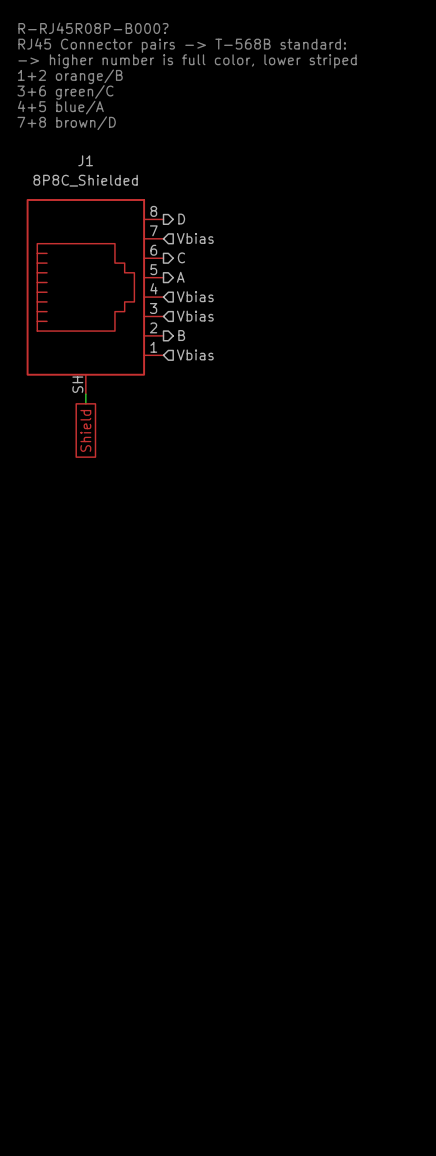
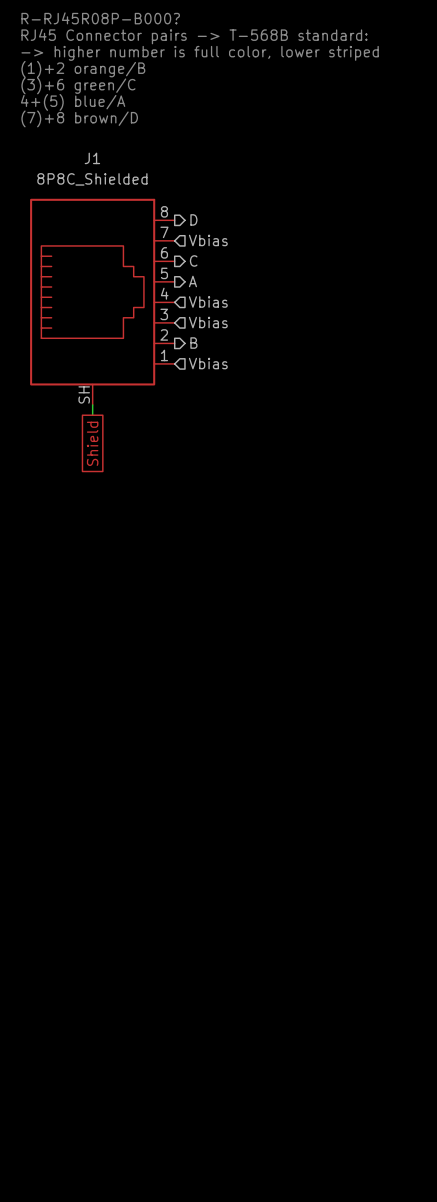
text: 1+2 orange/B (70, 76) -> (1)+2 orange/B (83, 69)
text: 3+6 green/C (65, 92) -> (3)+6 green/C (78, 85)
text: 4+5 blue/A (60, 107) -> 4+(5) blue/A (73, 102)
text: 7+8 brown/D (66, 123) -> (7)+8 brown/D (79, 118)

